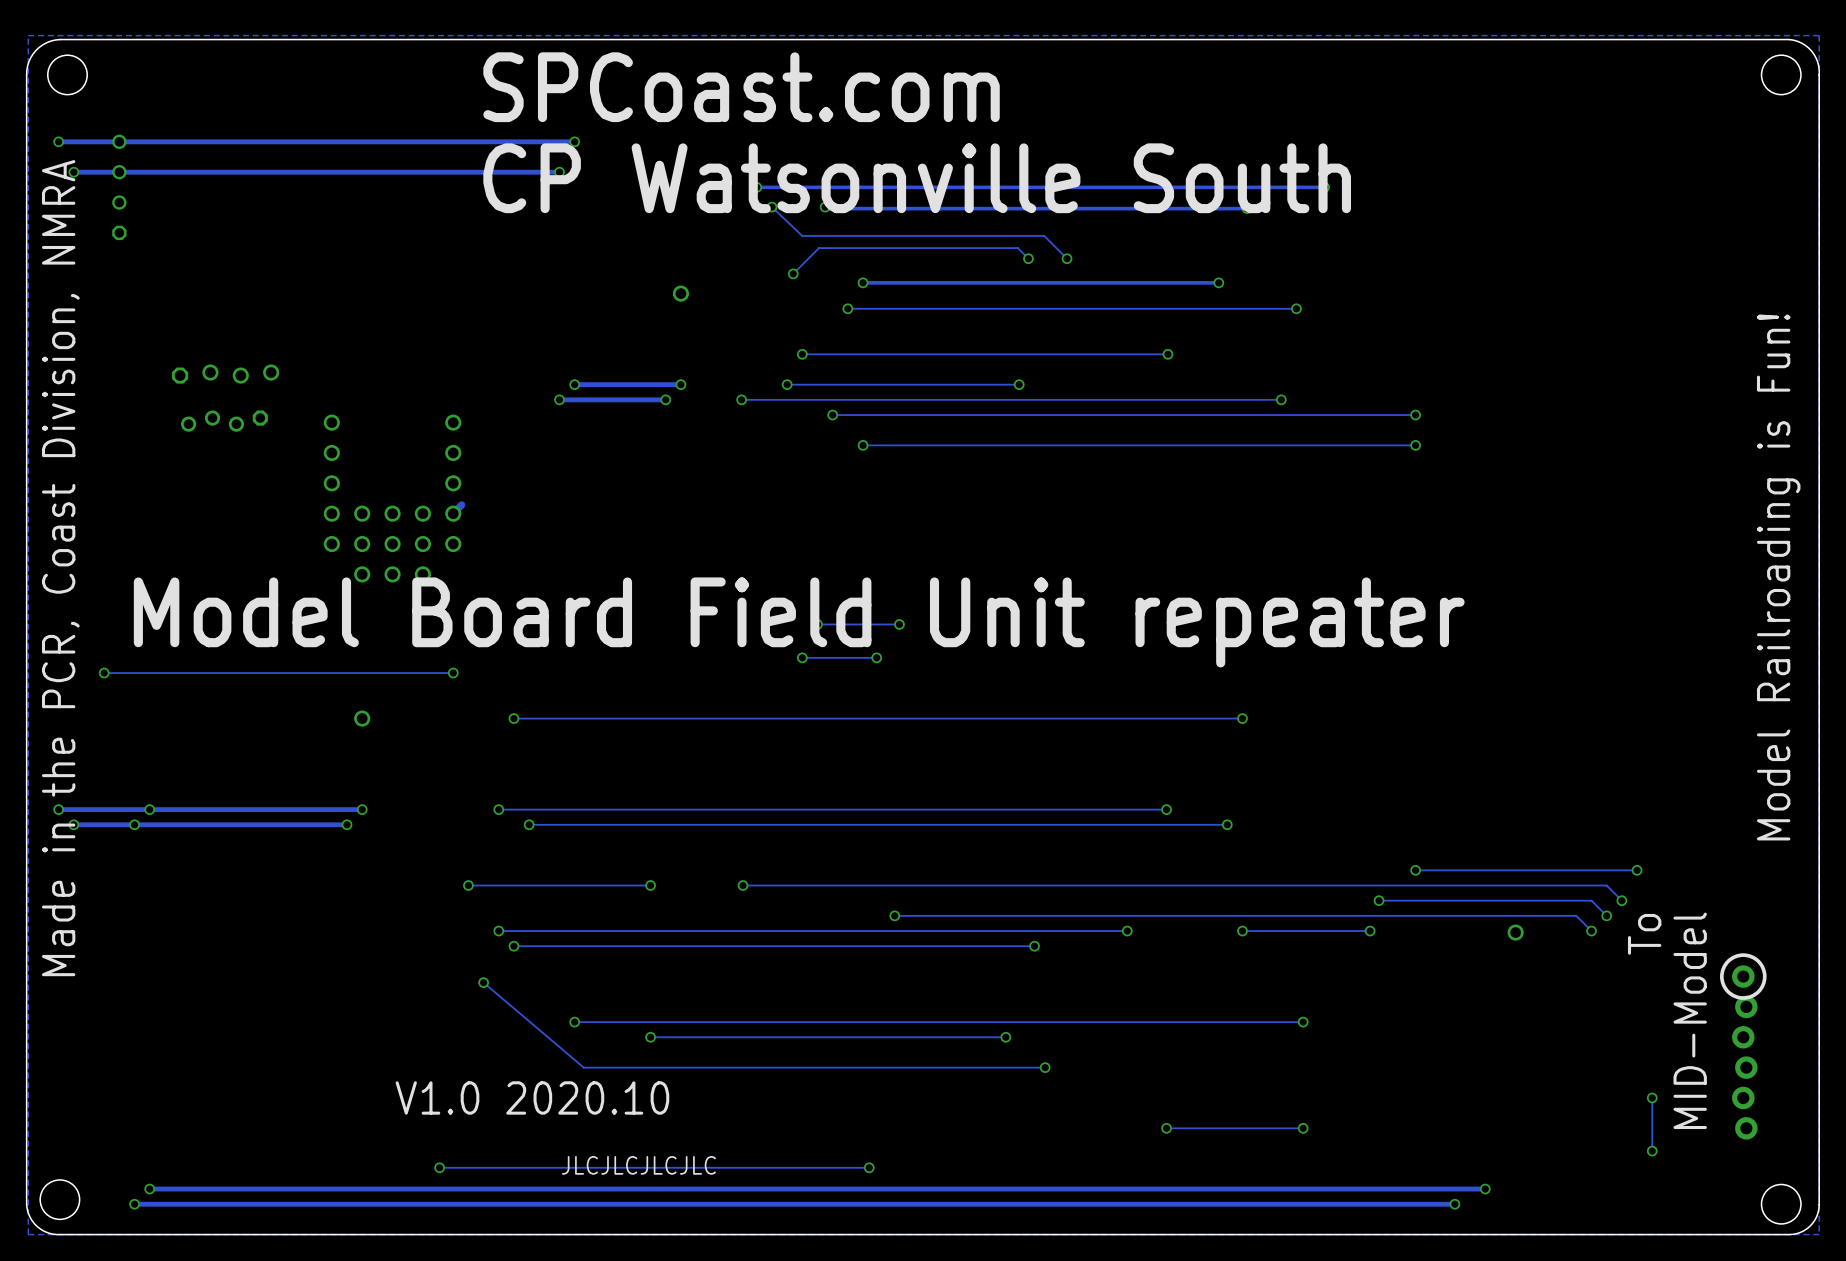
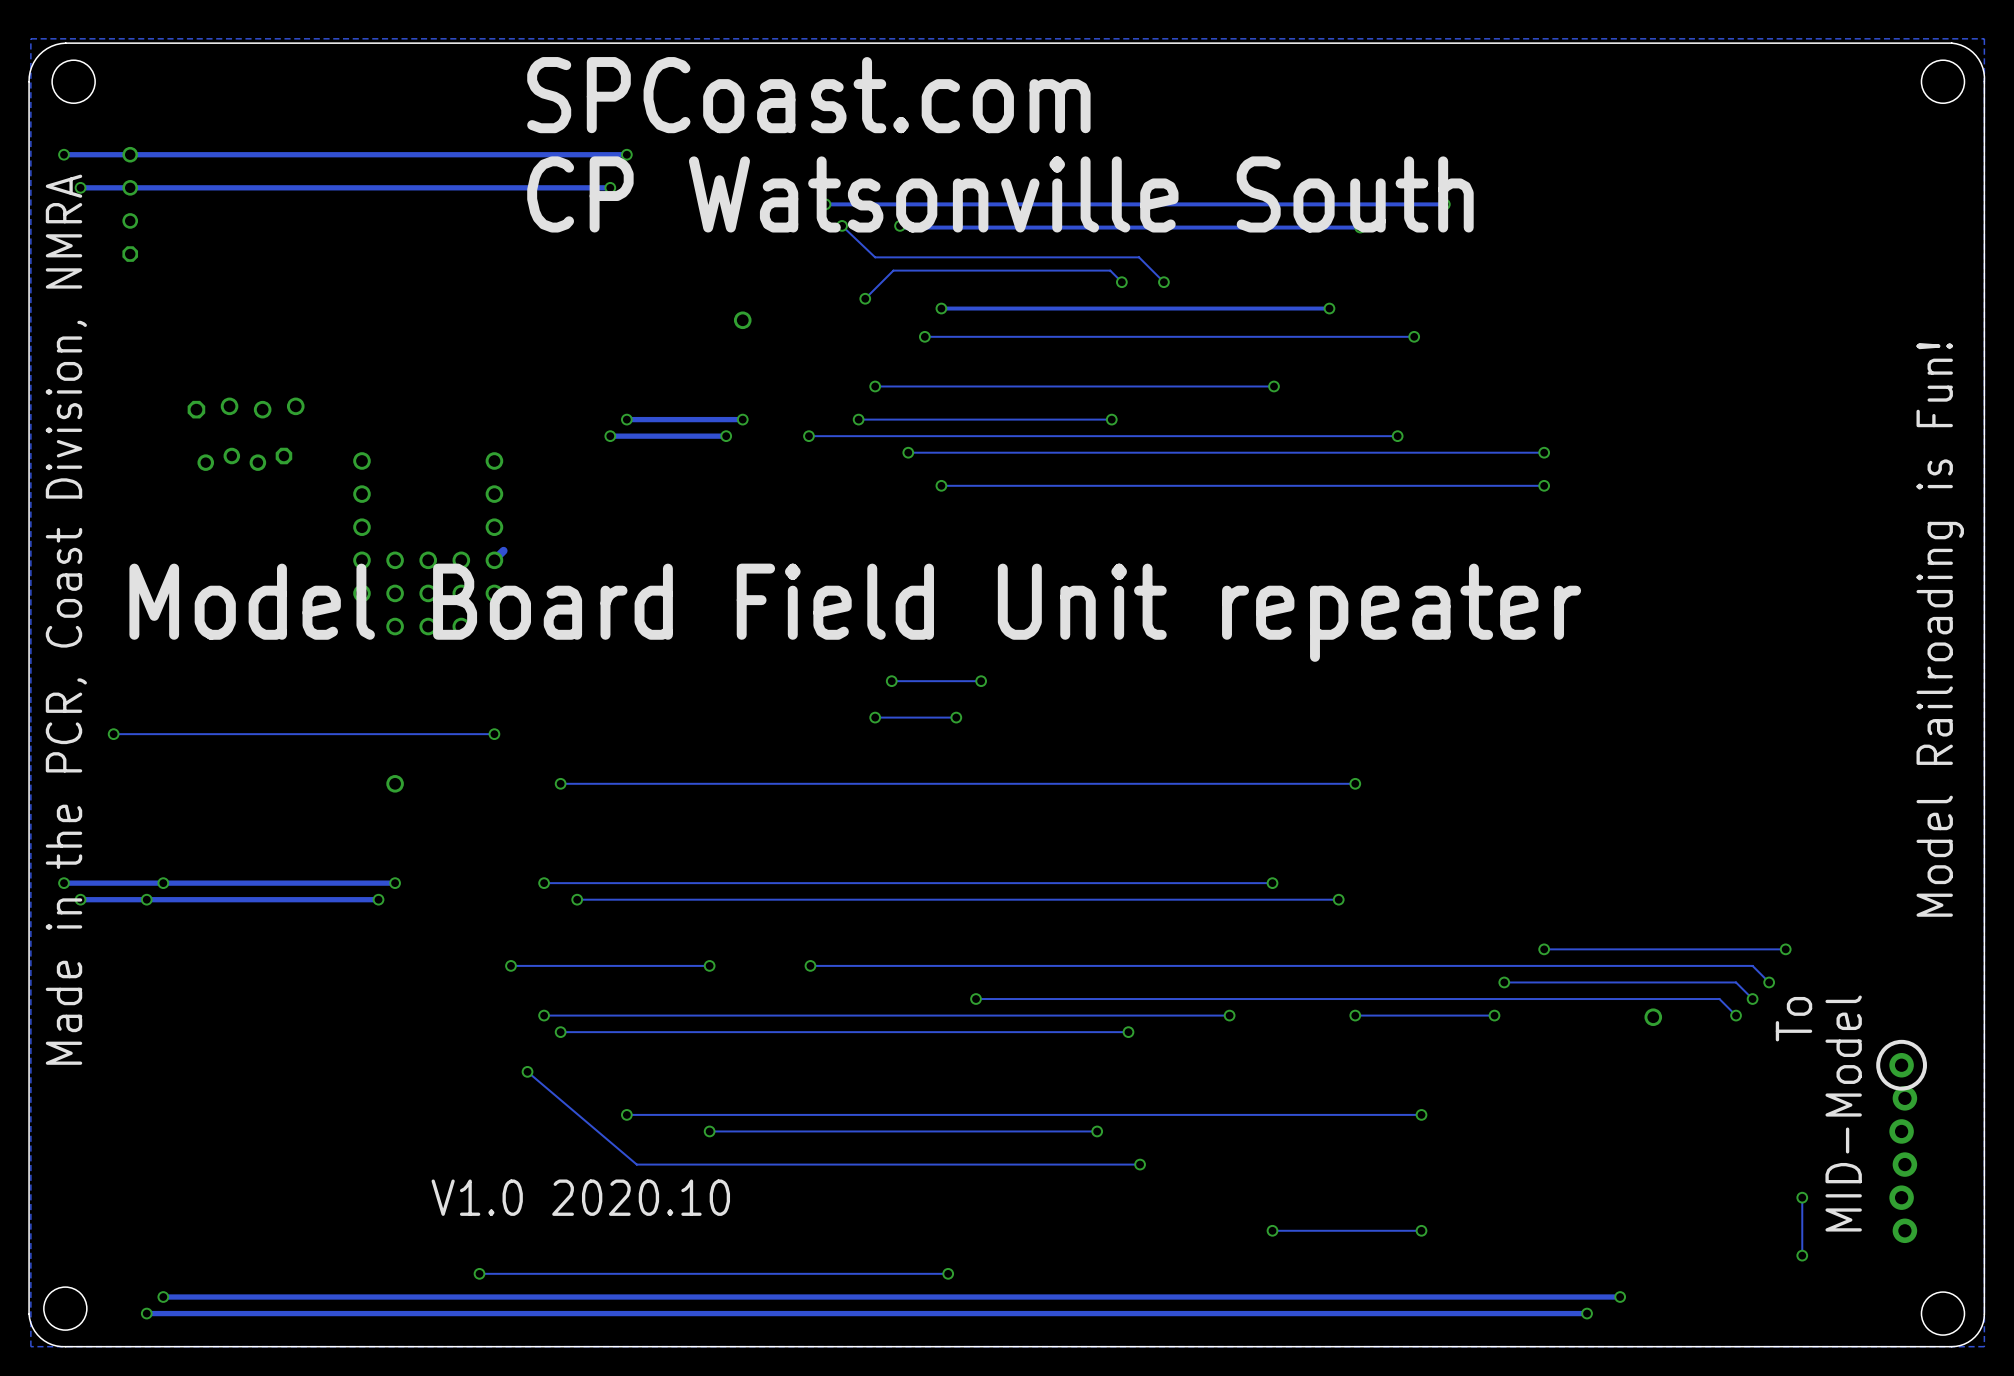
text position: Model Board Field Unit repeater (799, 622) -> Model Board Field Unit repeater (855, 612)
text: JLCJLCJLCJLC (638, 1165) -> none

